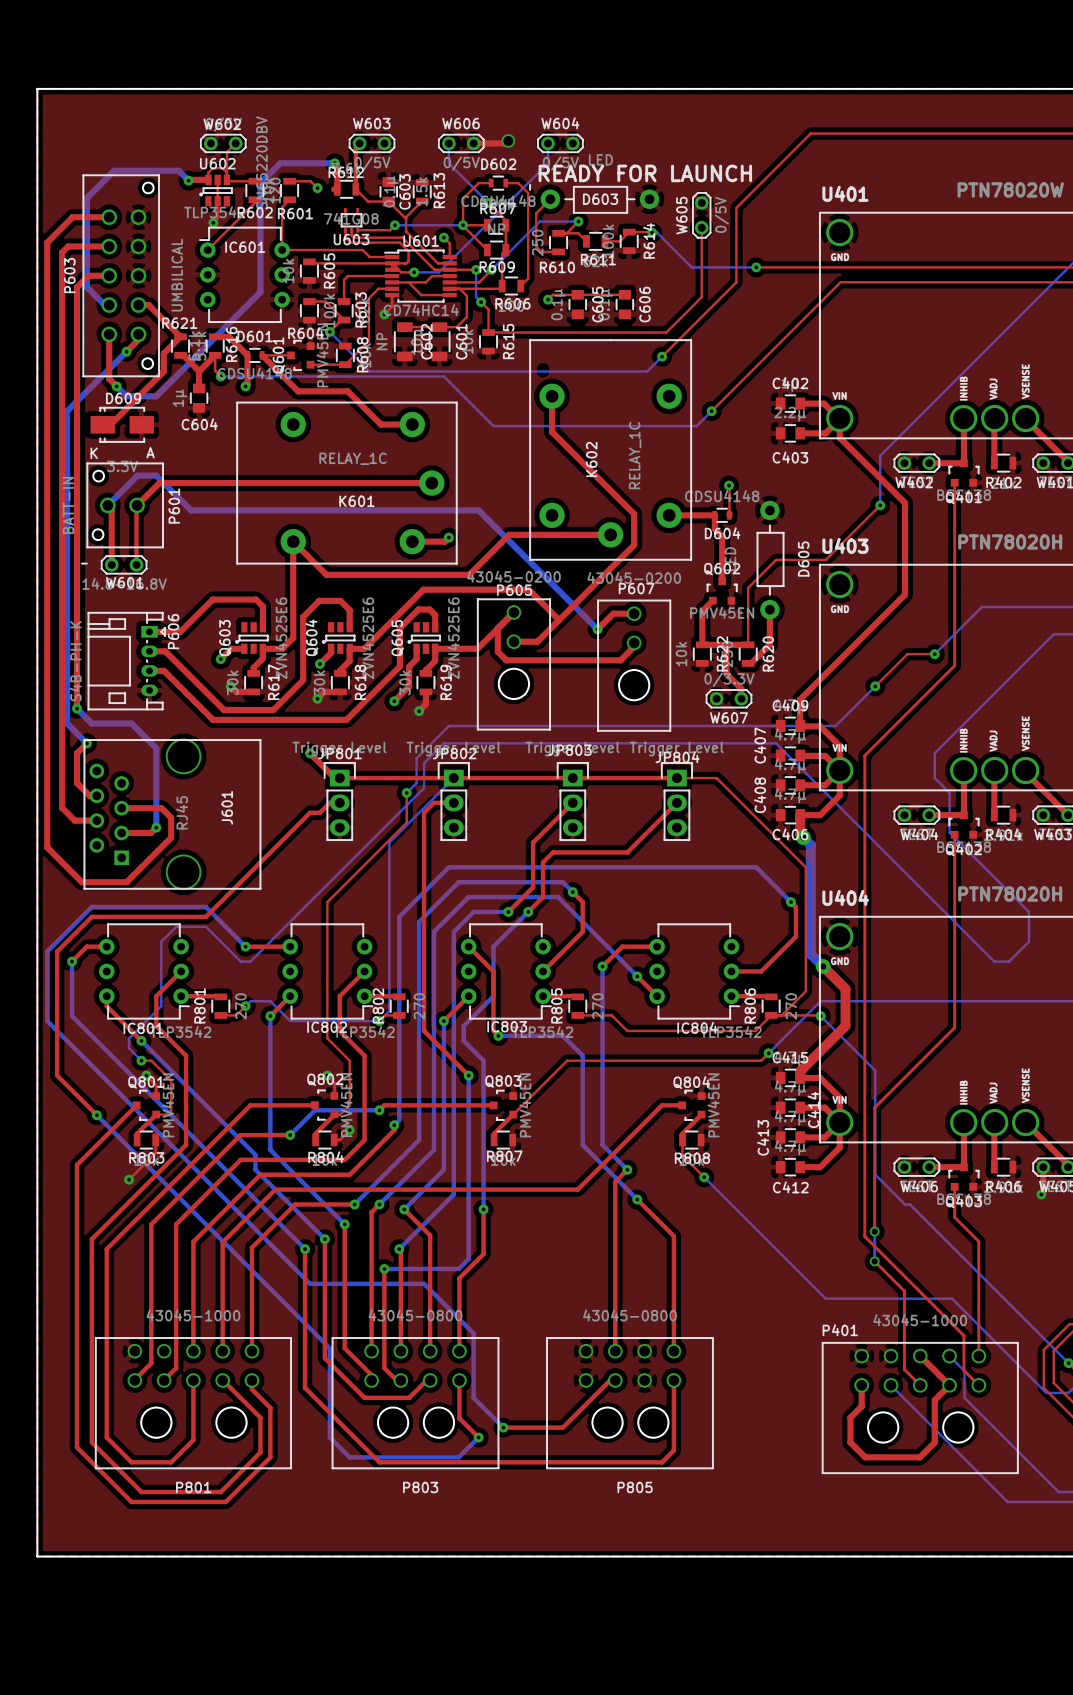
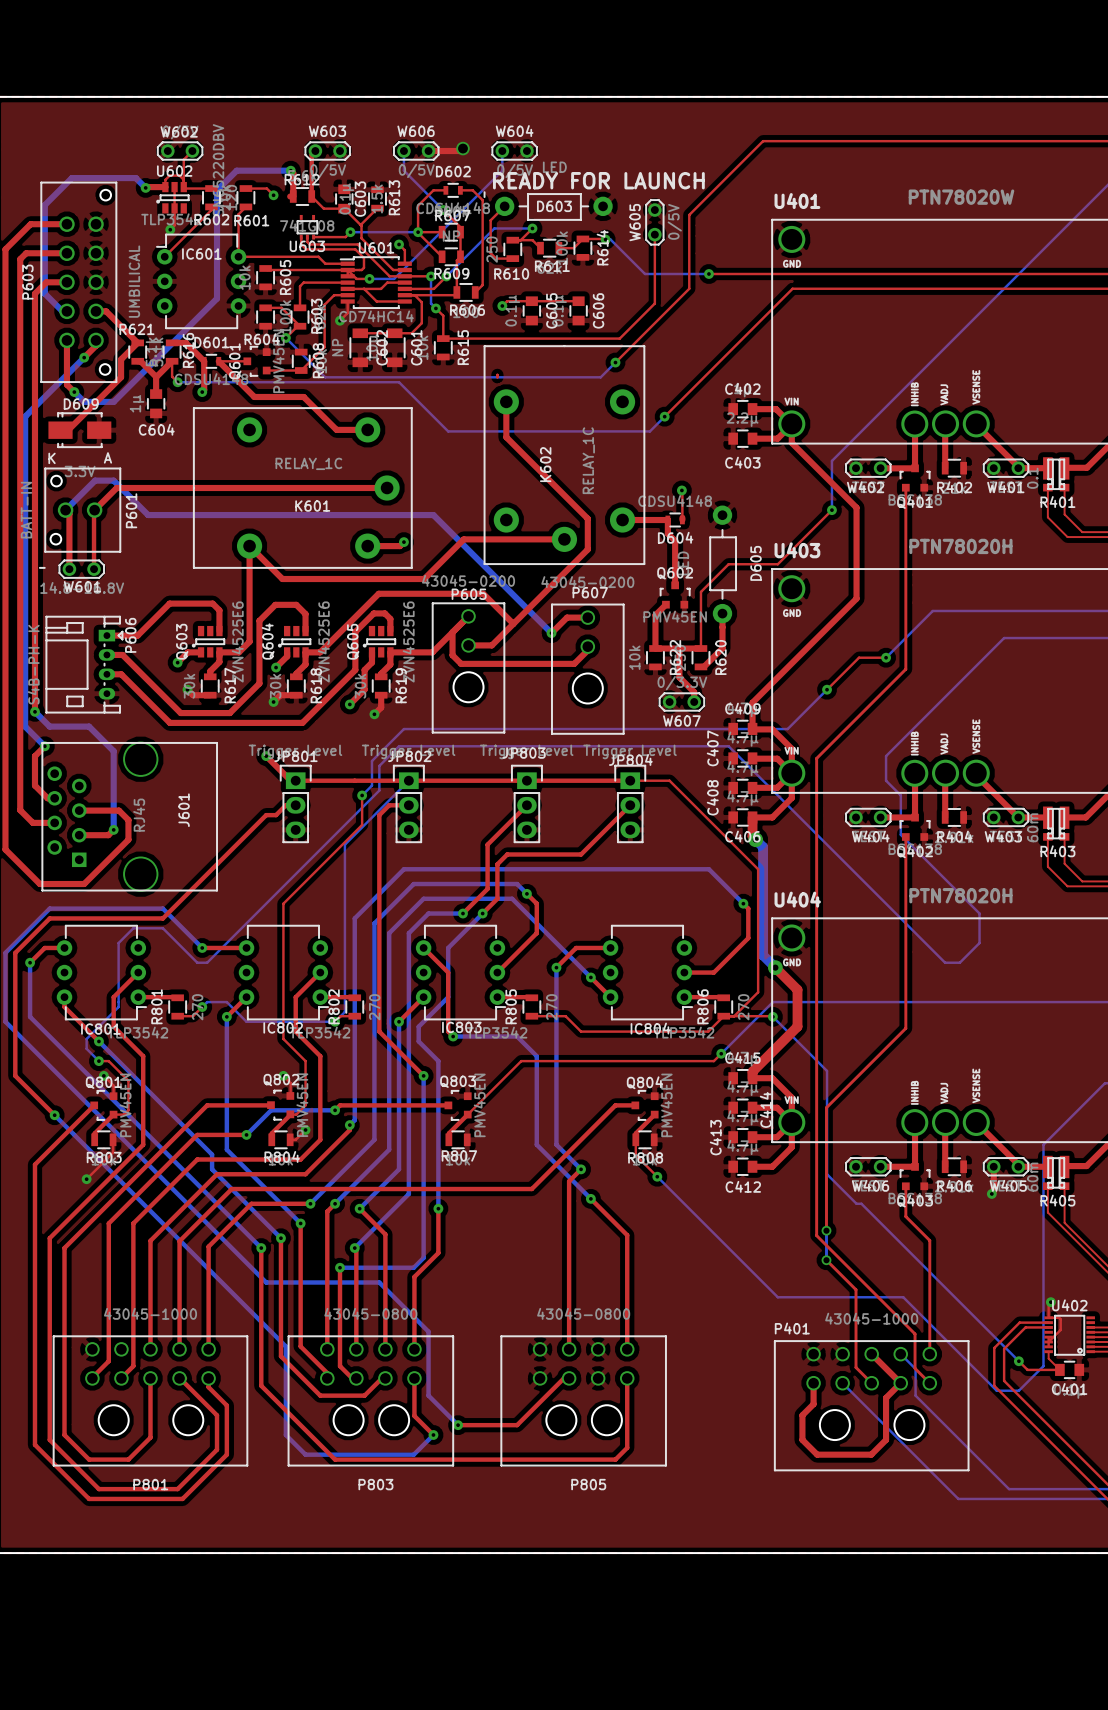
top track: none -> (497, 374) (497, 377)

